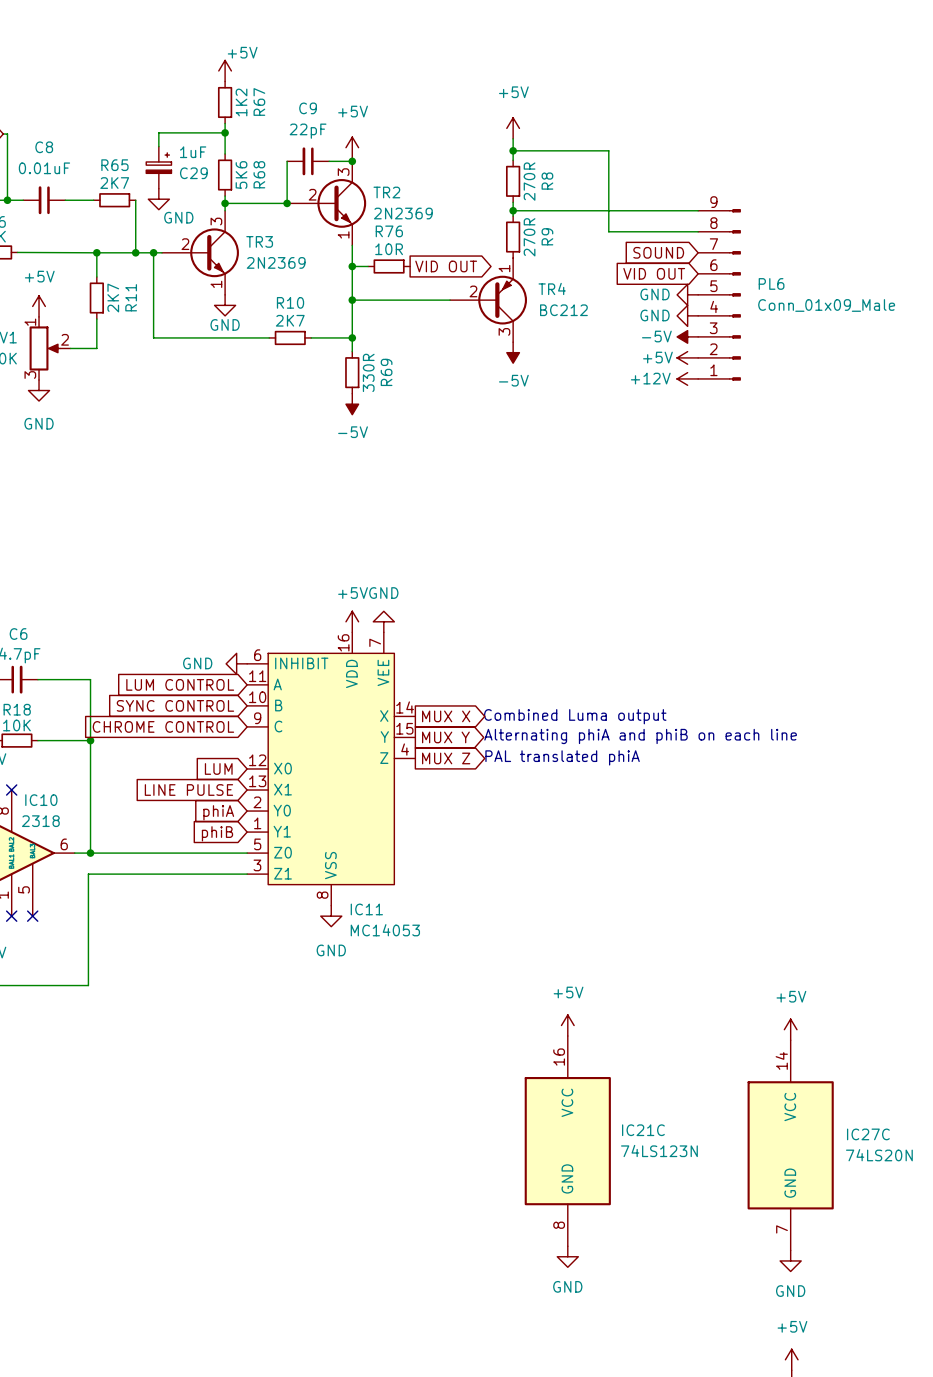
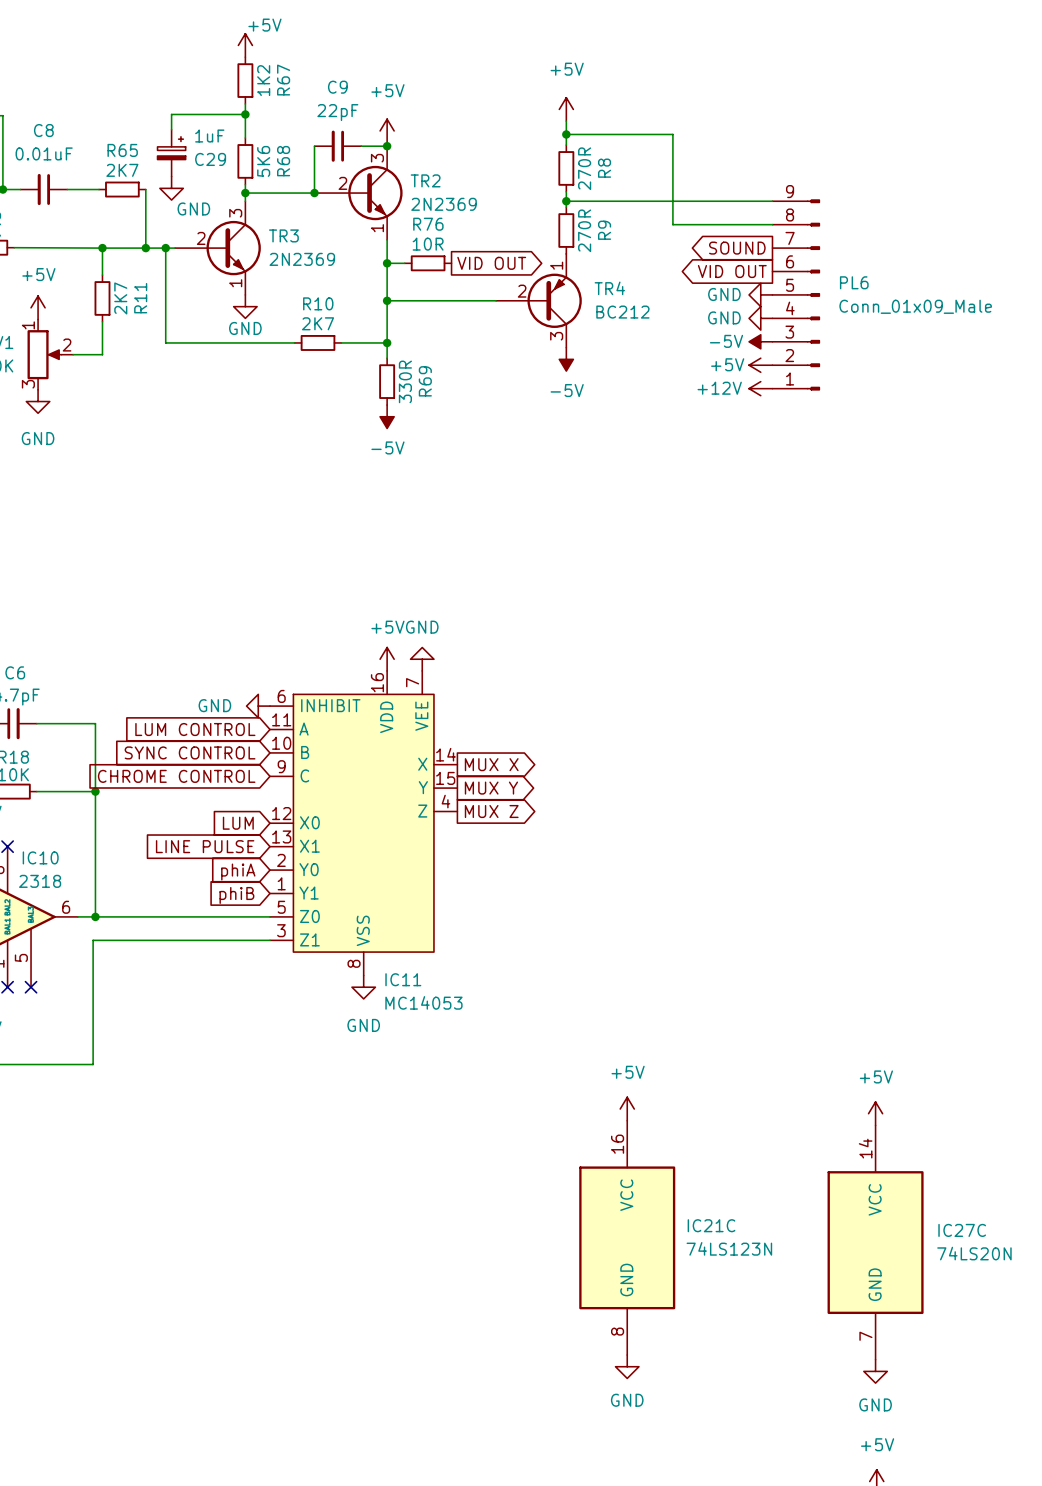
global label shape: input (658, 252) -> output (737, 248)
global label shape: input (654, 273) -> output (732, 271)
text: Combined Luma output (575, 716) -> none
text: Alternating phiA and phiB on each line (640, 736) -> none
text: PAL translated phiA (562, 757) -> none

